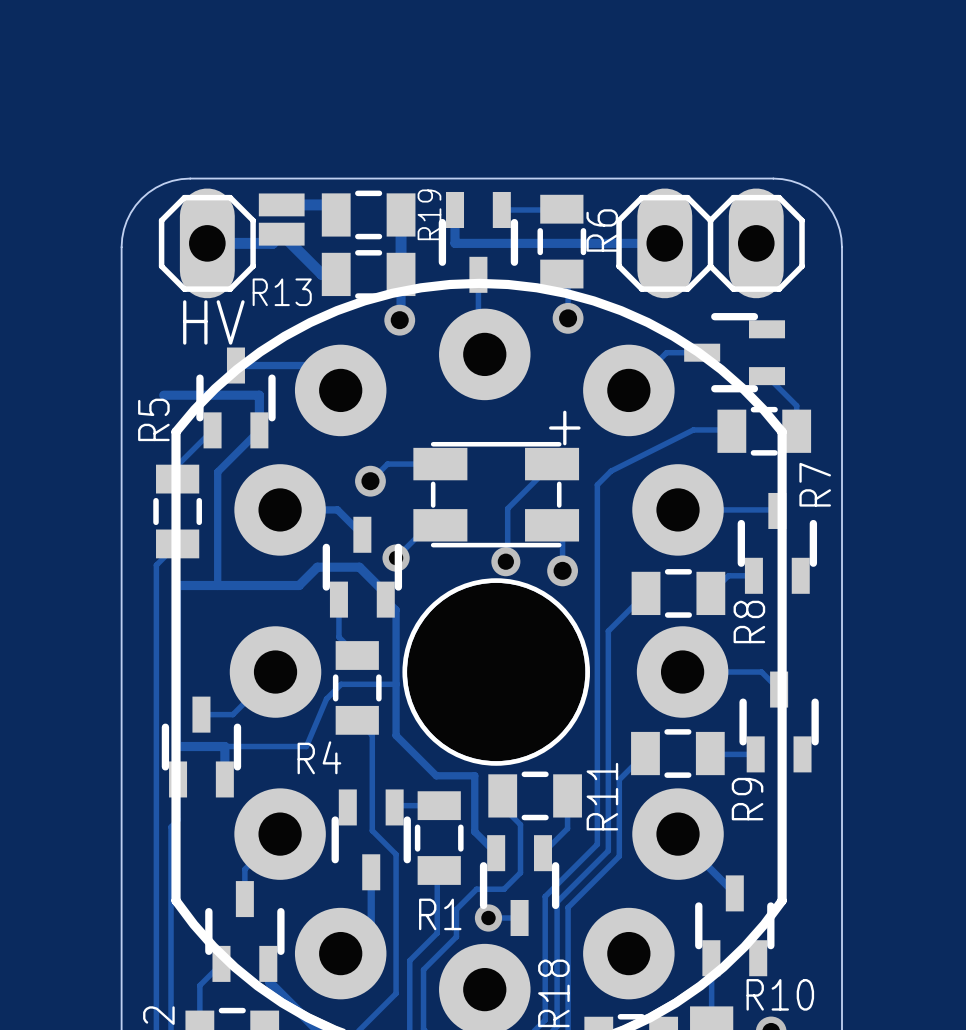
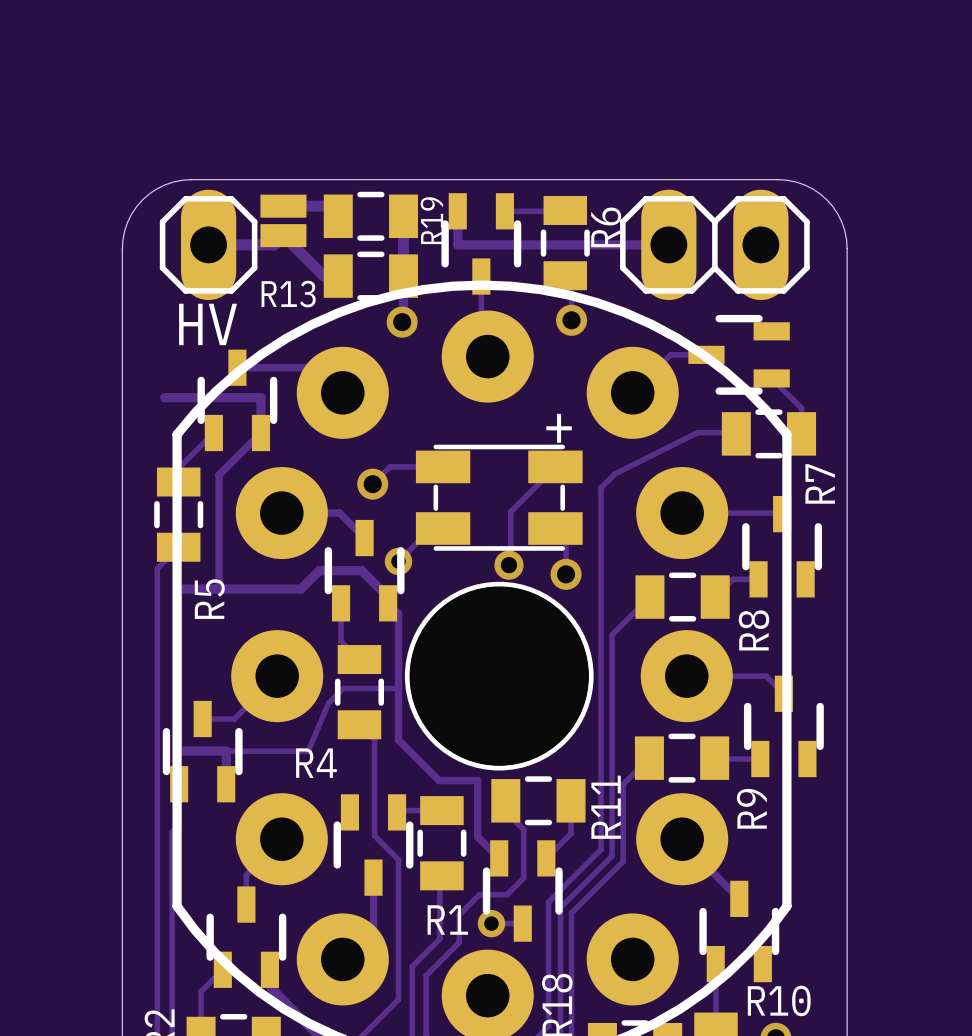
R5 name position: R5 (153, 419) -> R5 (209, 599)

